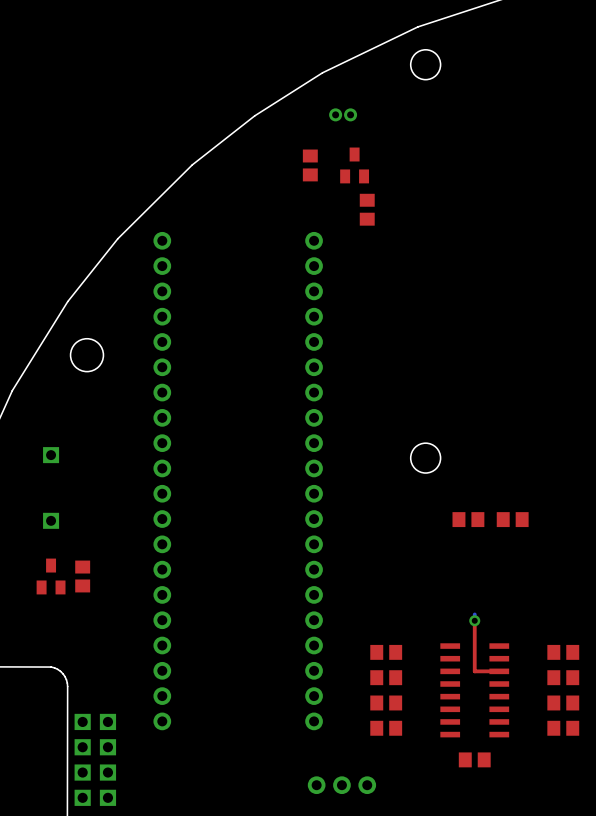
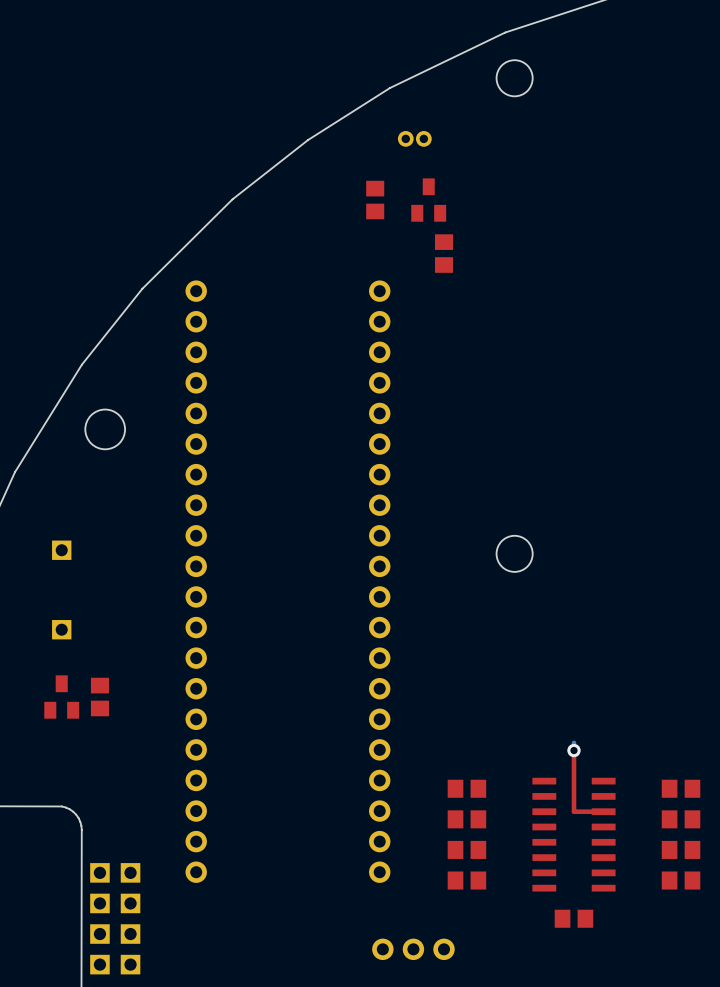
part: (468, 519) -> none
part: (512, 519) -> none

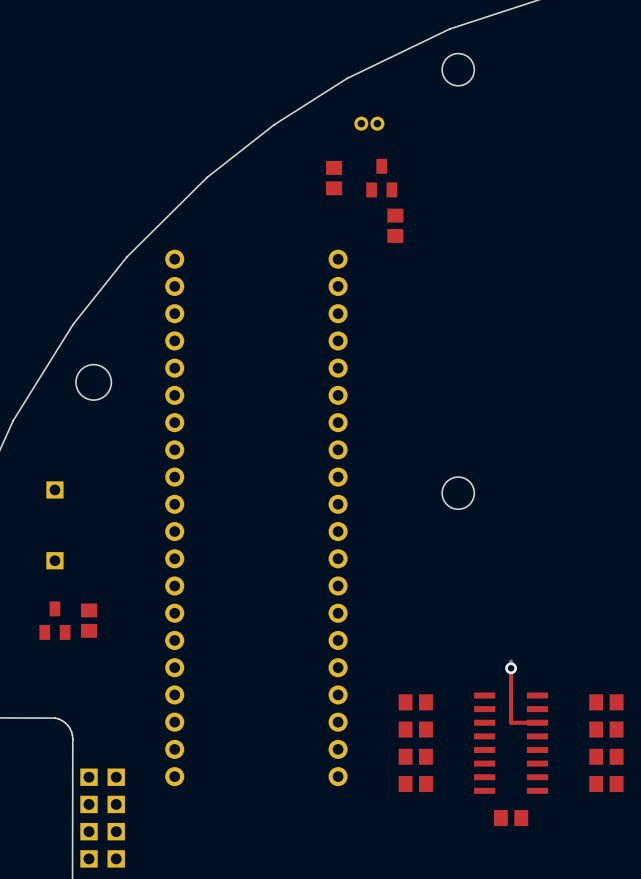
part: (413, 949) -> none

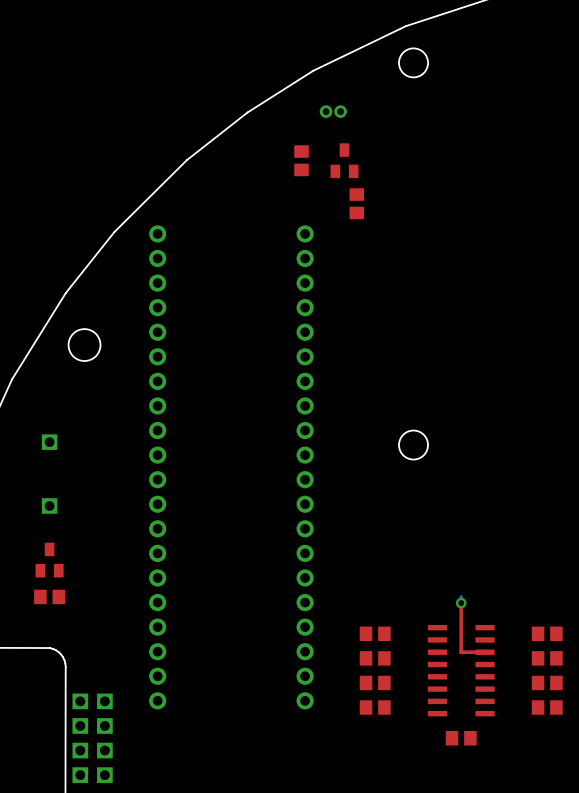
part rotation: 0° (89, 620) -> 90° clockwise (49, 596)
part position: (89, 620) -> (49, 596)

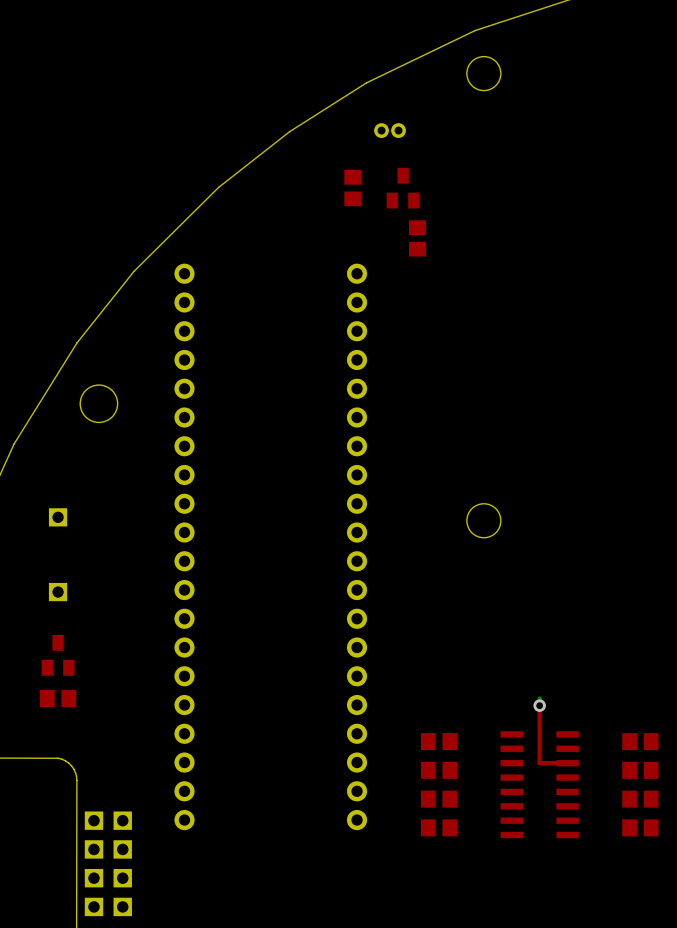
part: (461, 738) -> none

